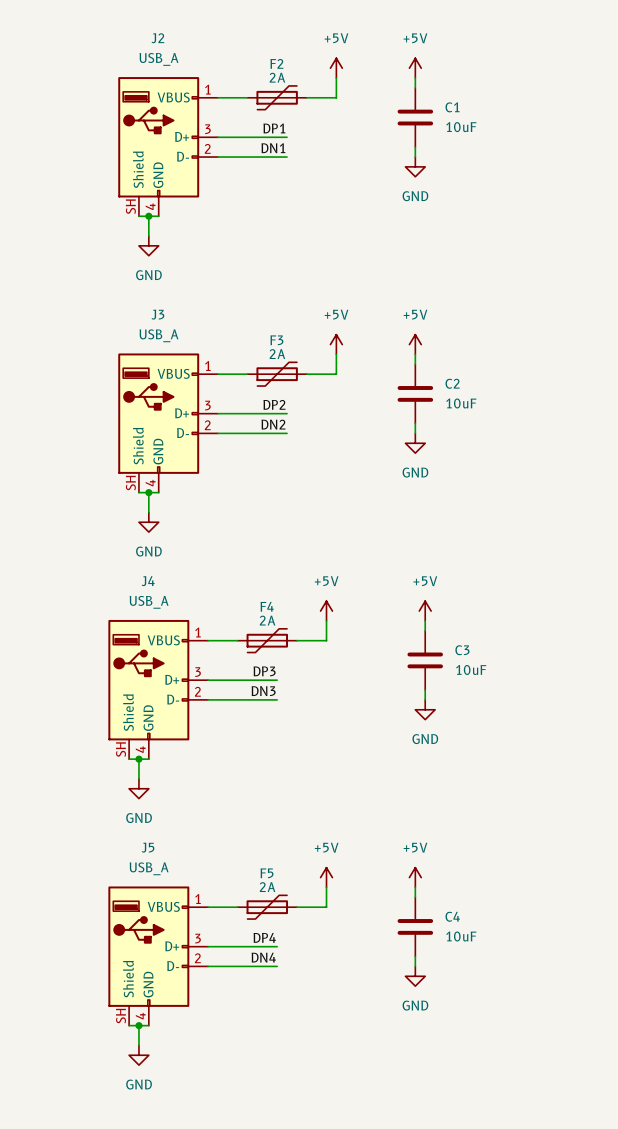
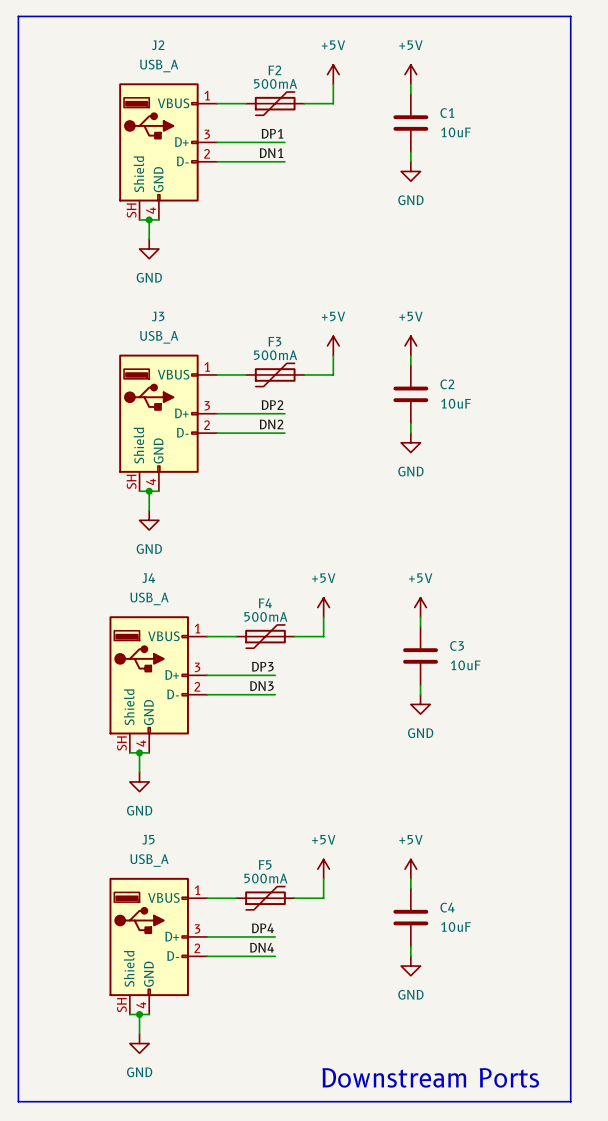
line: none -> (18, 16) (570, 16) (570, 1101) (18, 1101) (18, 16)
F2 value: 2A (277, 77) -> 500mA (275, 83)
F3 value: 2A (277, 354) -> 500mA (275, 355)
F4 value: 2A (267, 620) -> 500mA (265, 616)
F5 value: 2A (267, 887) -> 500mA (265, 878)
text: none -> Downstream Ports (430, 1077)

